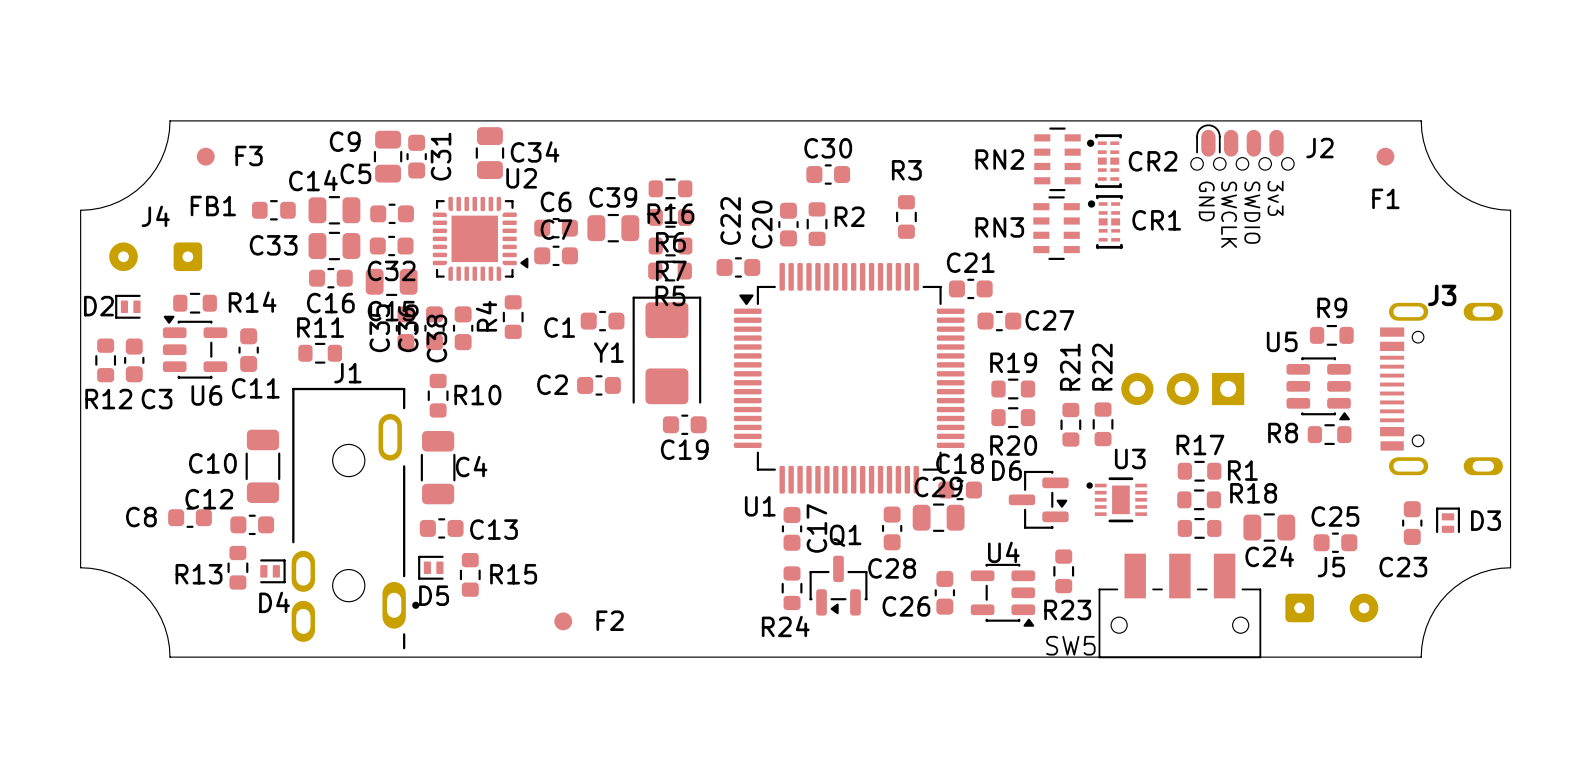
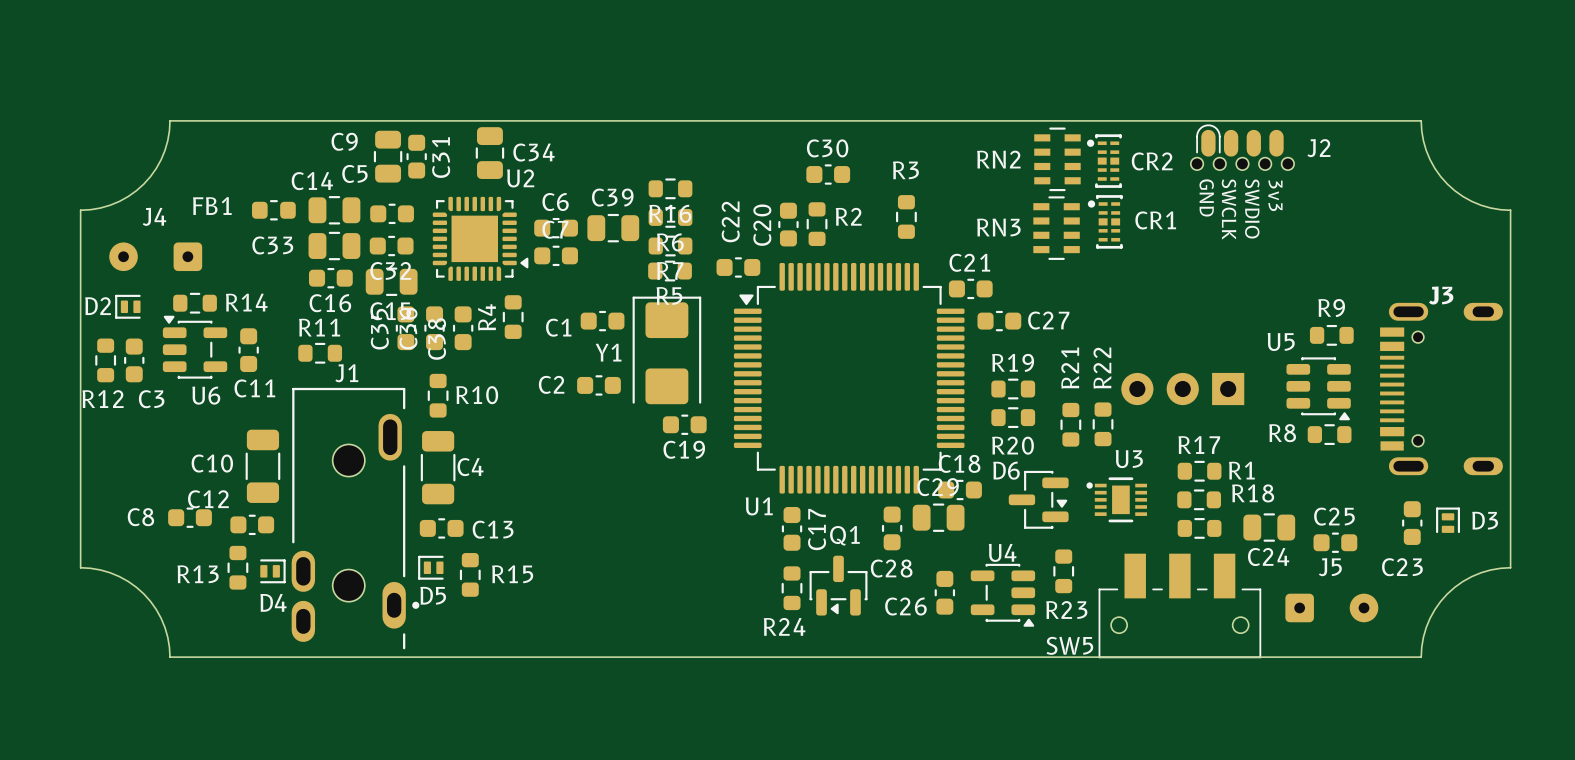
F3: (205, 156) -> none
F1: (1385, 156) -> none
F2: (563, 621) -> none

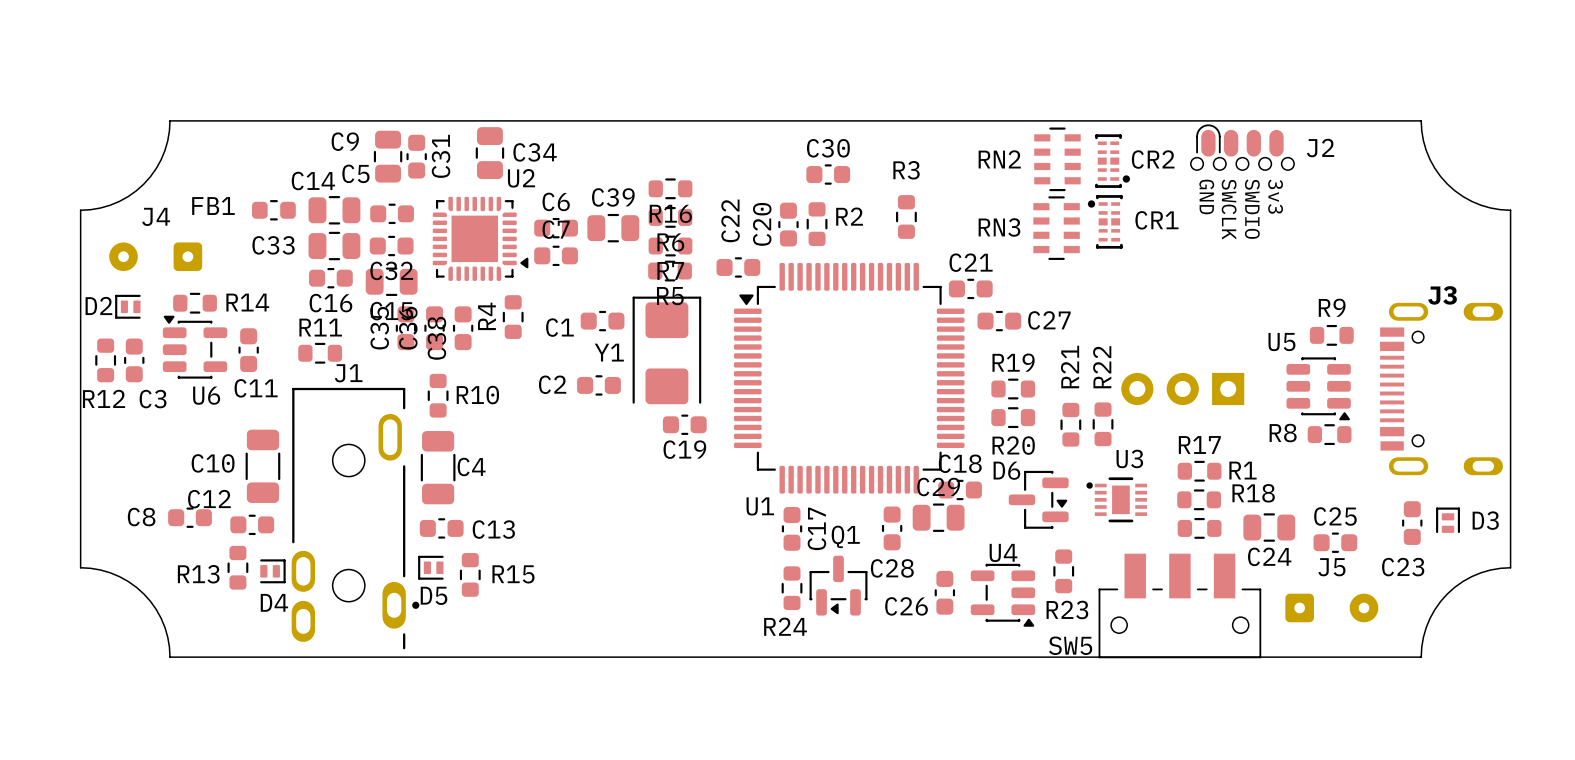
CR2 rotation: 0° (1104, 161) -> 180° (1112, 161)

